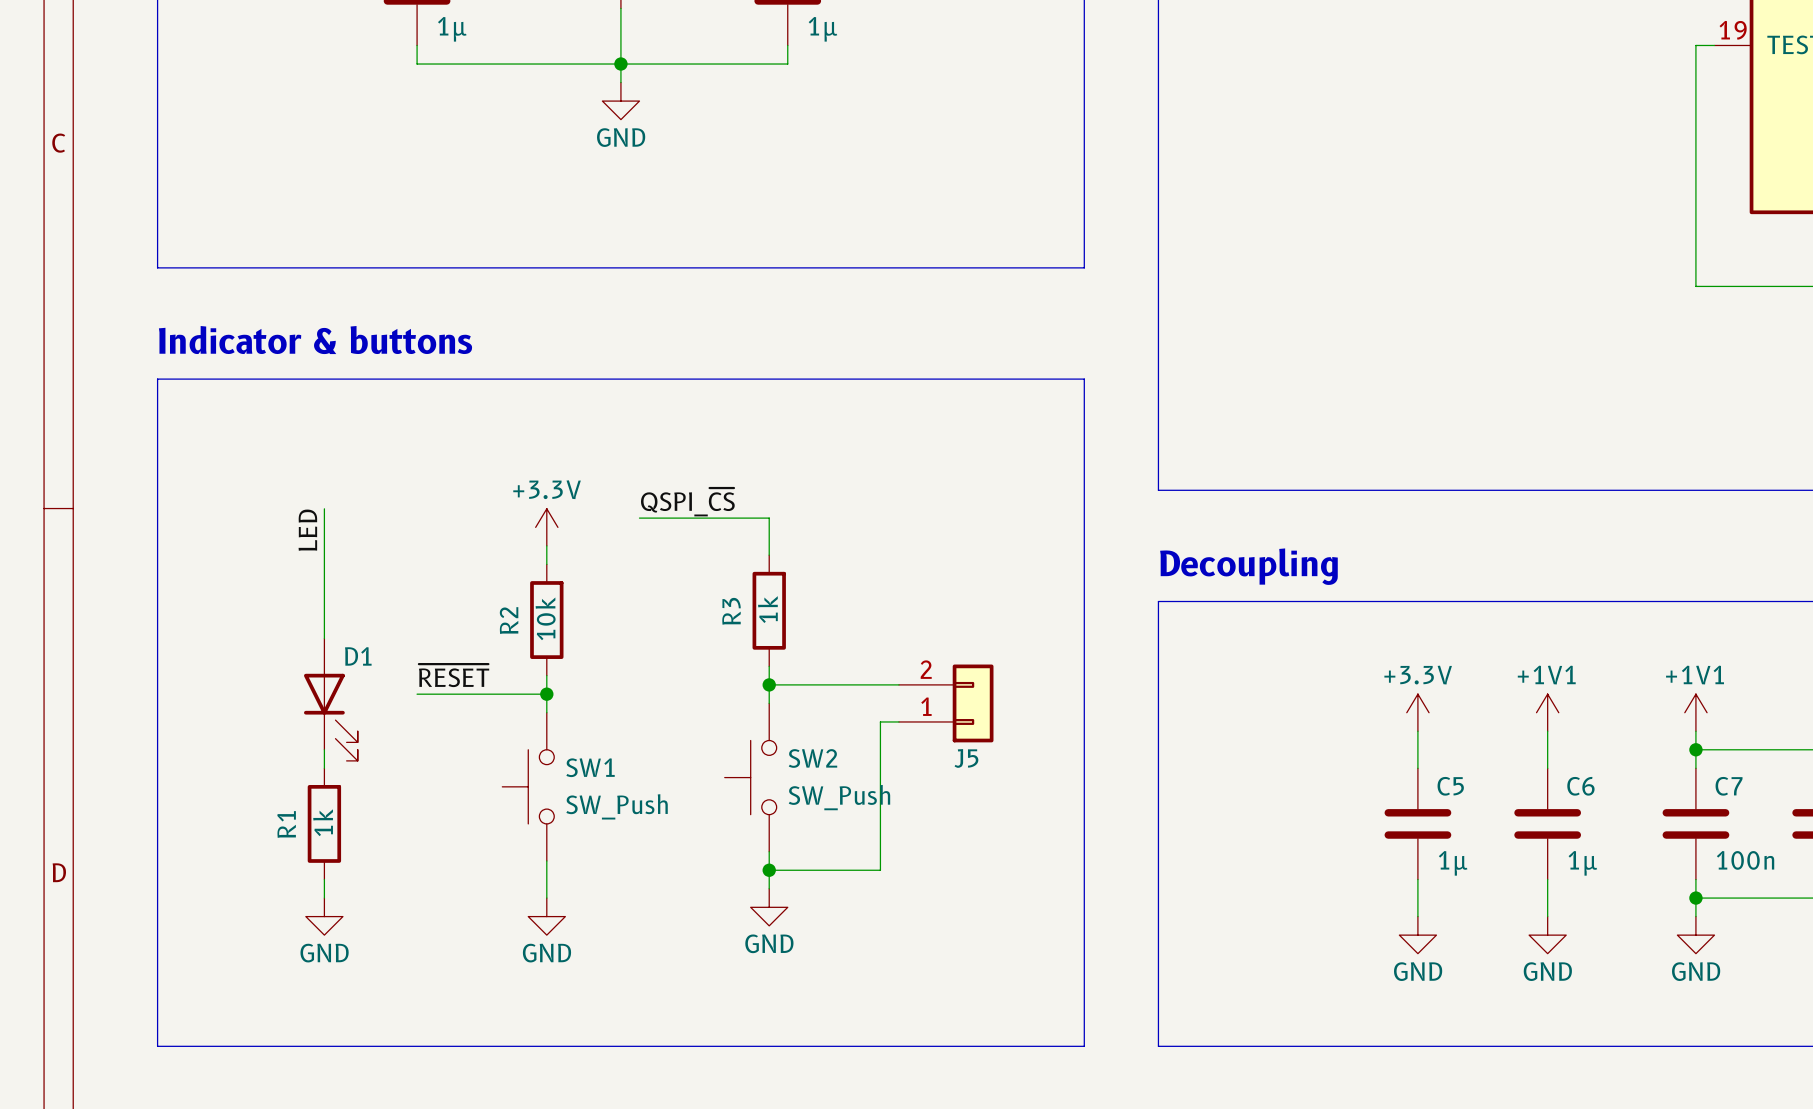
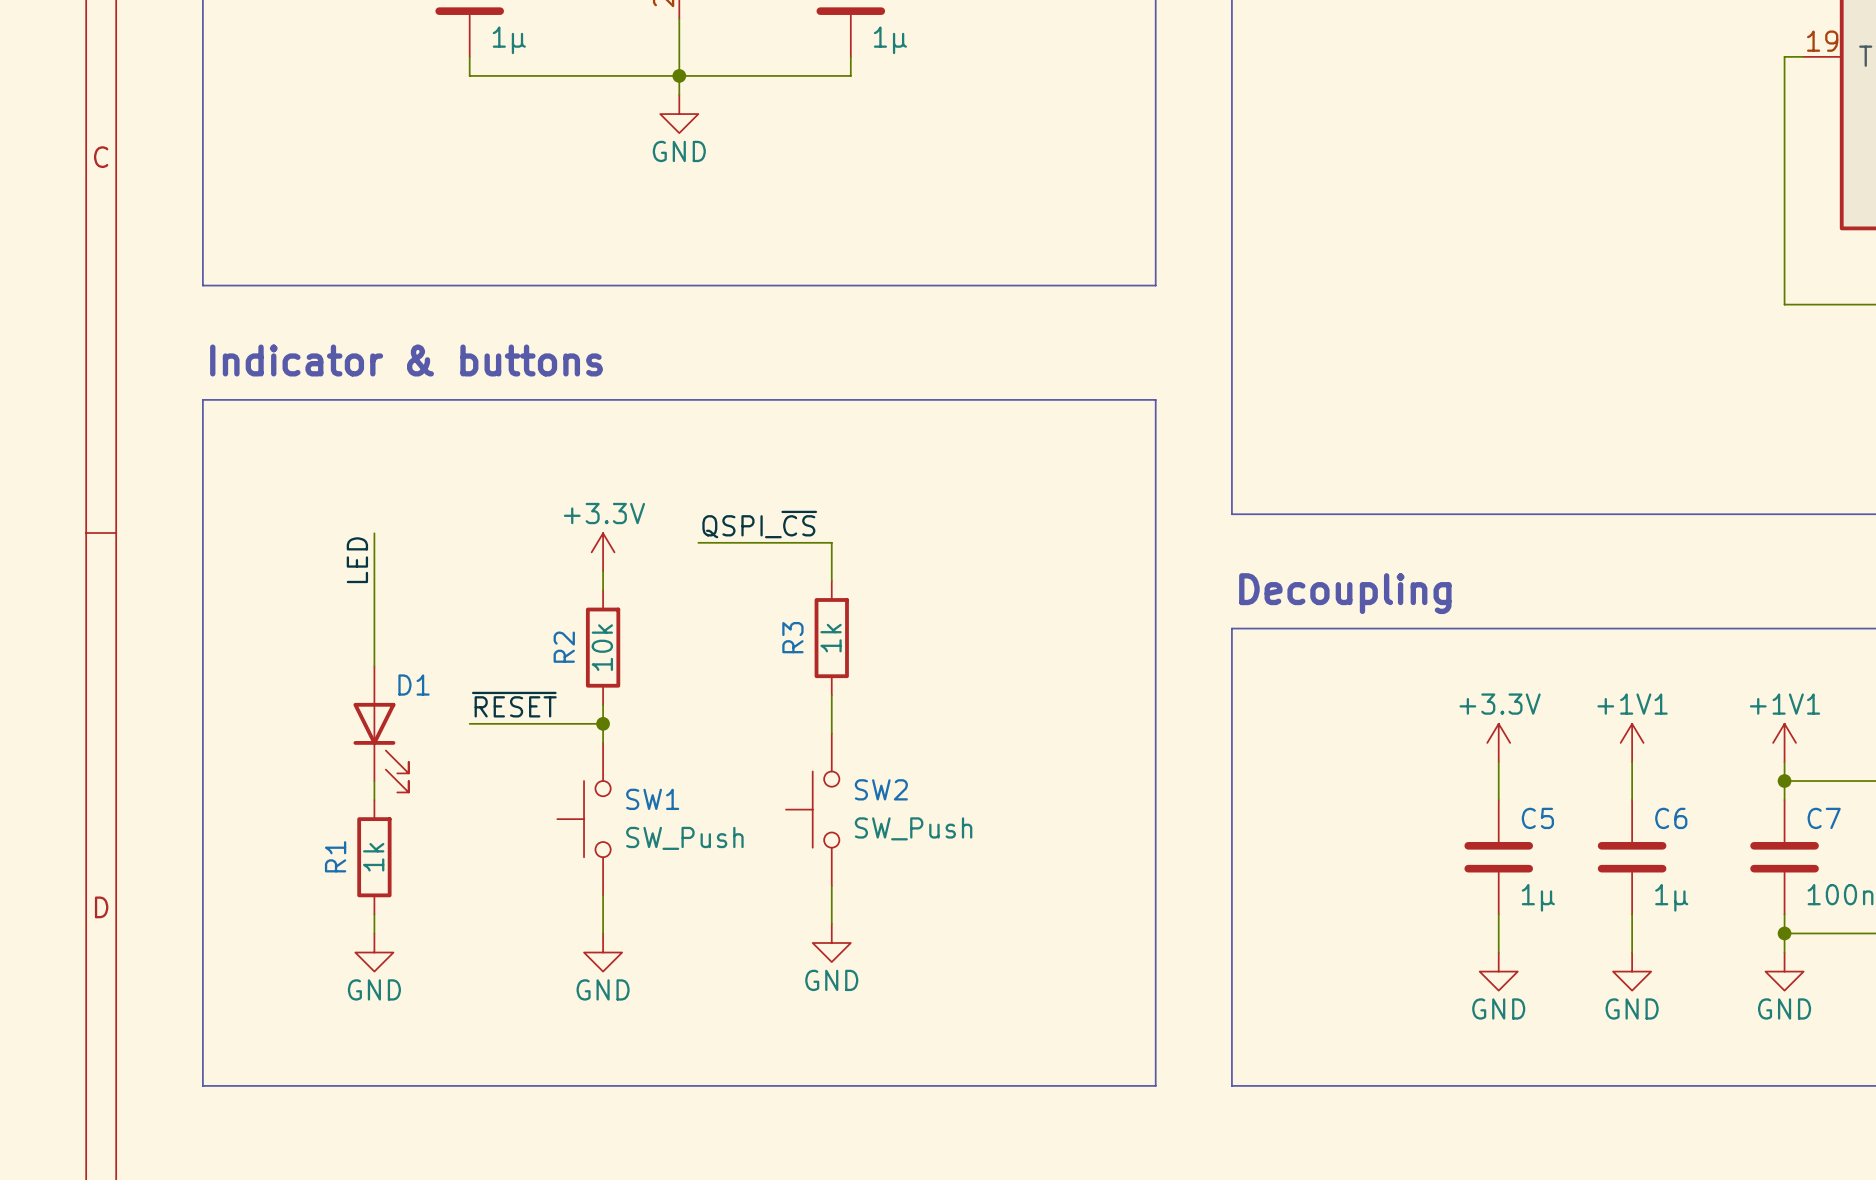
wire: (769, 684) (898, 684) -> none
junction: (769, 684) -> none
J5: (946, 703) -> none
wire: (898, 721) (880, 721) (880, 870) (769, 870) -> none
junction: (769, 870) -> none

